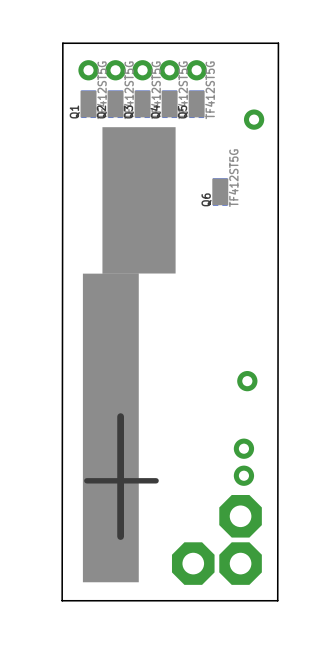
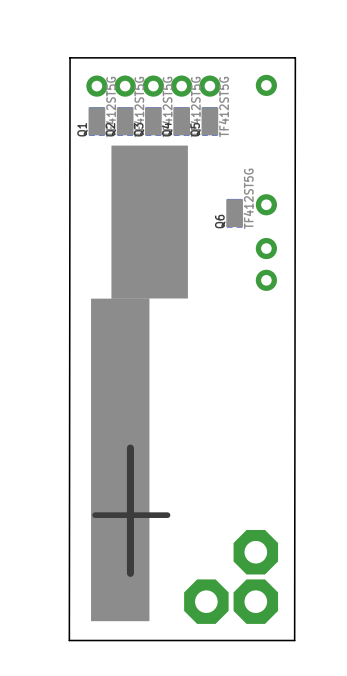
part: none -> (266, 85)
part: (254, 119) -> none
part: none -> (266, 204)
part: none -> (266, 248)
part: none -> (266, 280)
part: (247, 381) -> none
part: (243, 448) -> none
part: (243, 475) -> none

